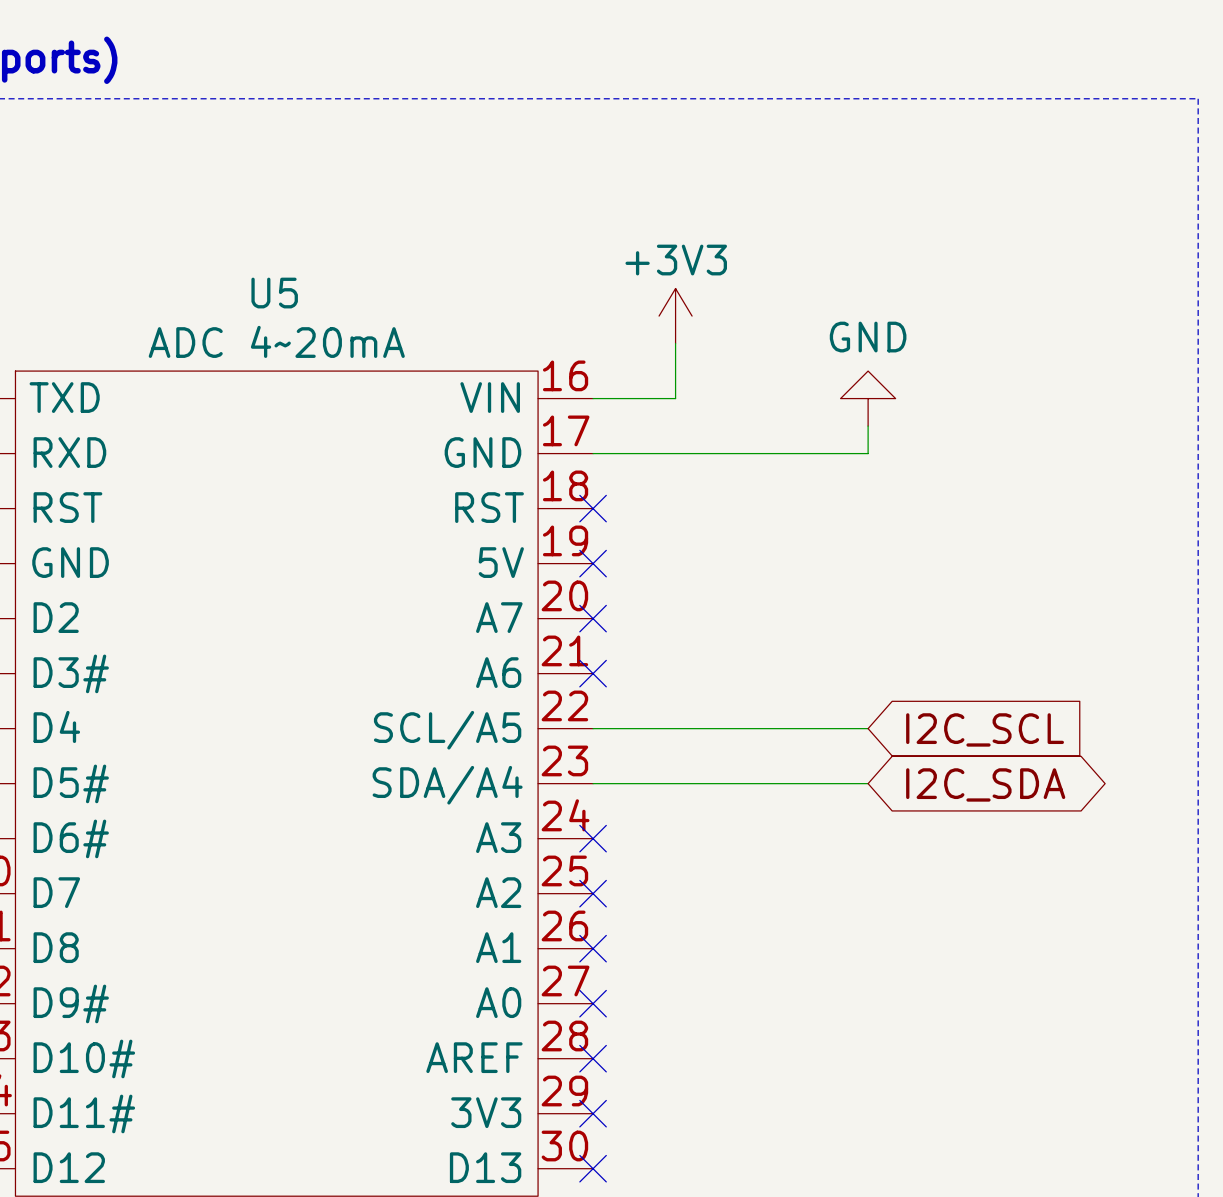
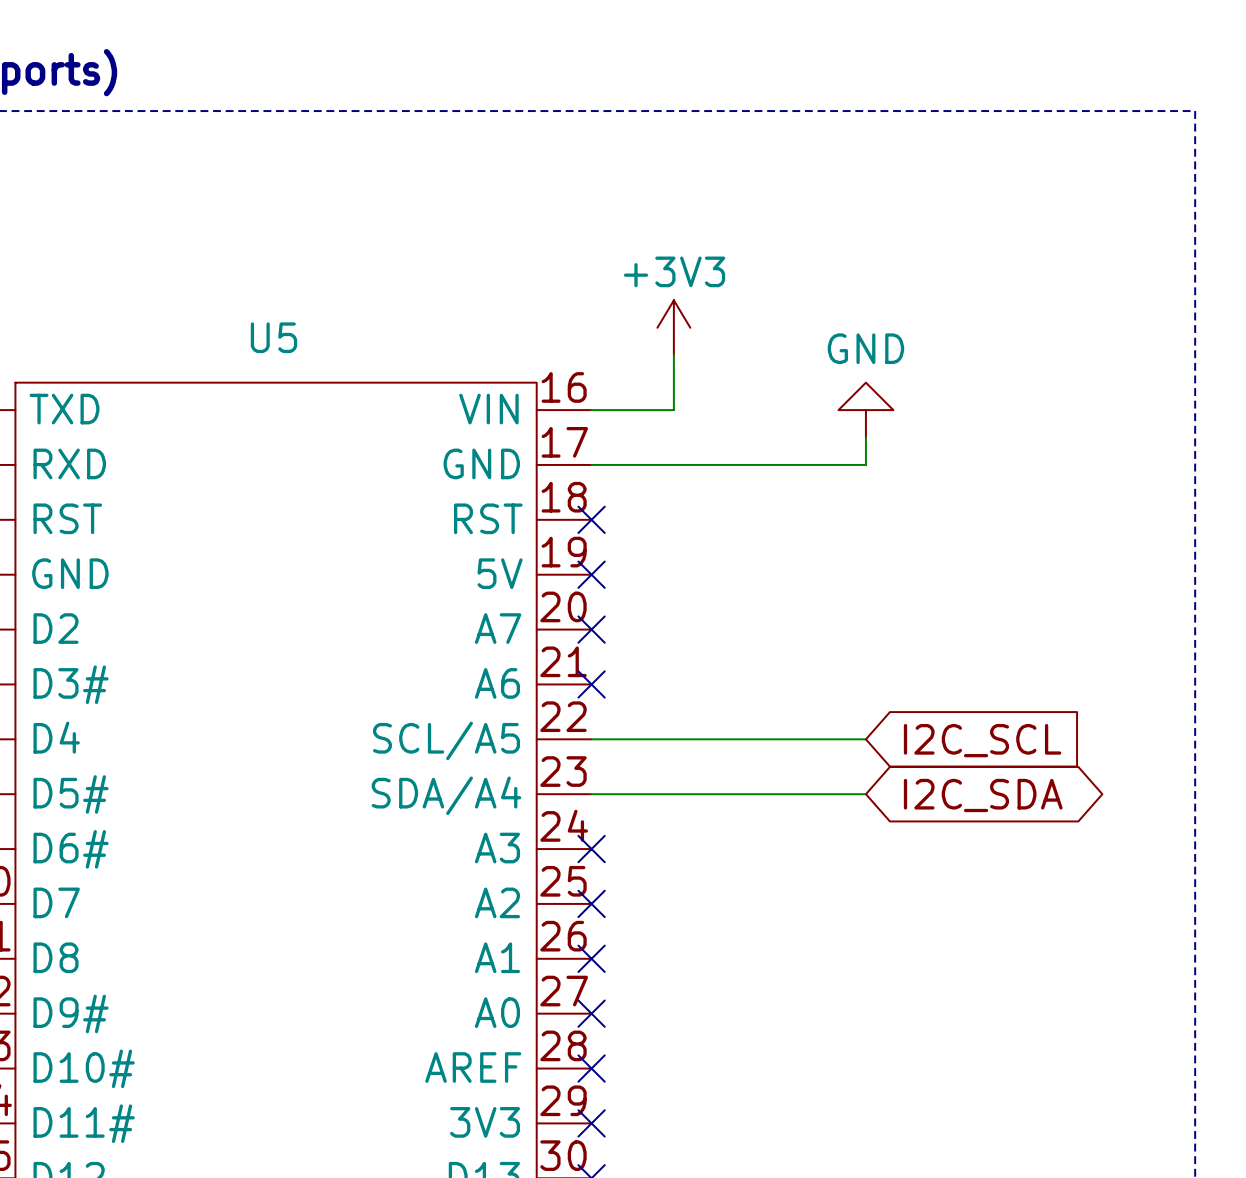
U5 name position: U5 (274, 293) -> U5 (273, 337)
U5 value: ADC 4~20mA (276, 341) -> none

